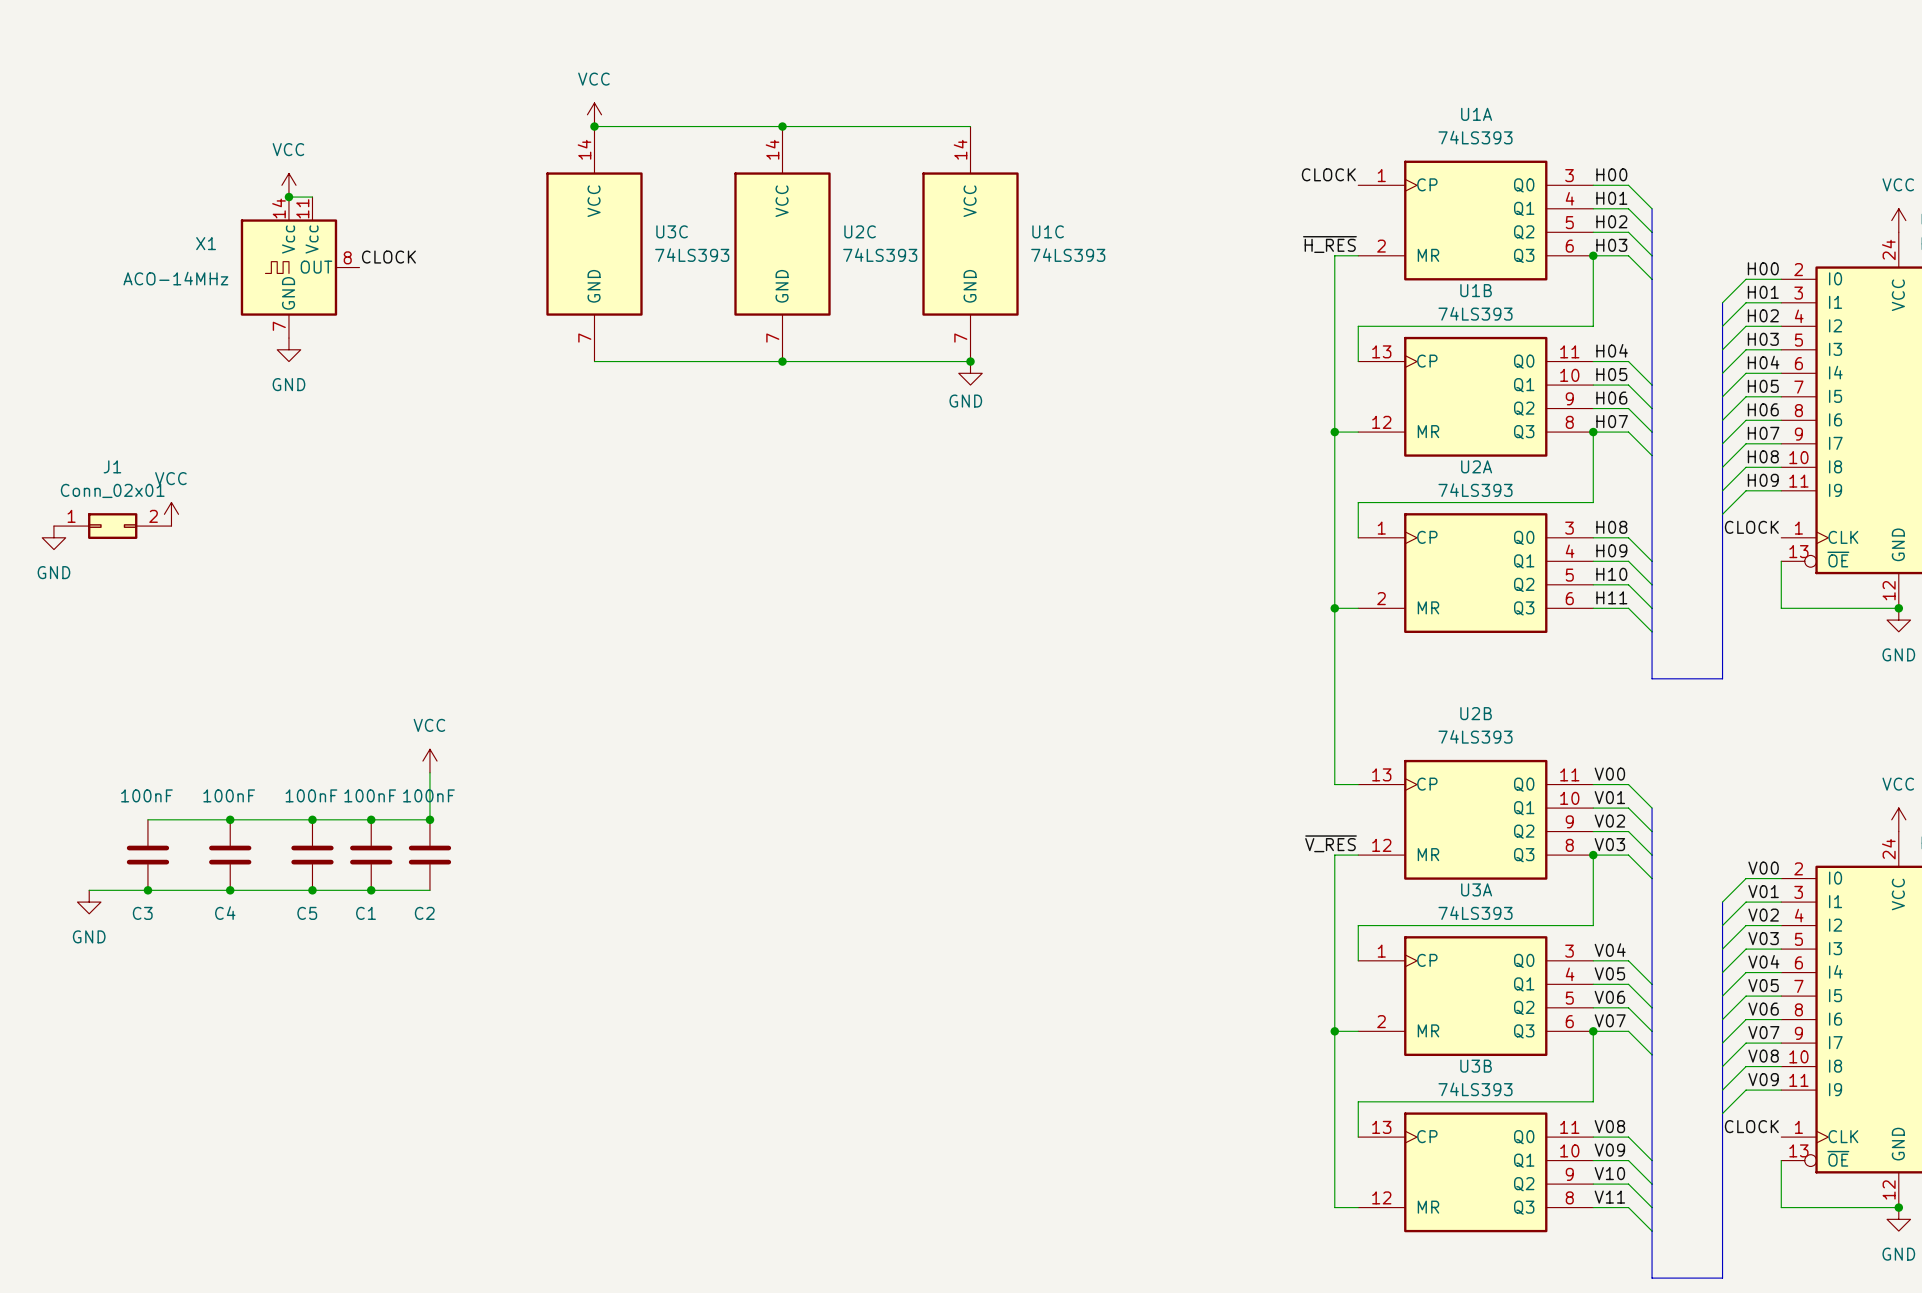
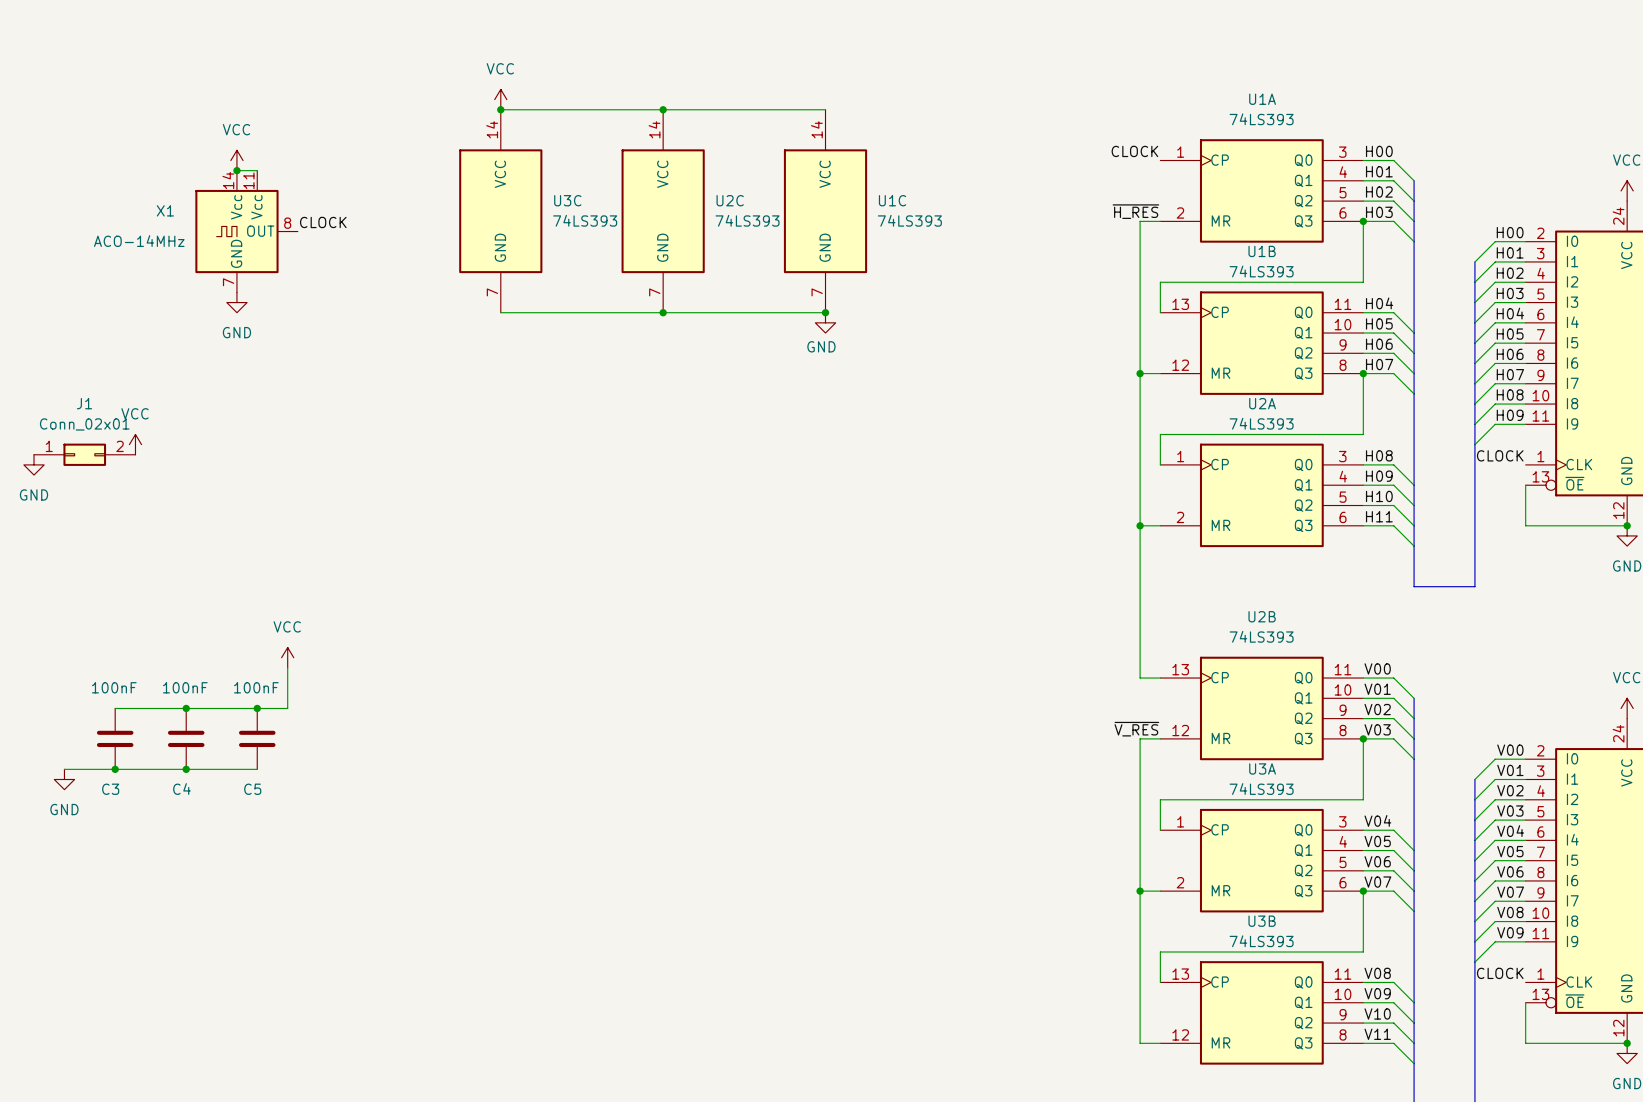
power symbol position: VCC (429, 761) -> VCC (287, 657)
wire: (429, 772) (429, 819) (347, 819) -> (287, 667) (287, 708)
junction: (371, 819) -> none
junction: (429, 819) -> none
C1: 100nF (371, 855) -> none
C2: 100nF (429, 855) -> none
wire: (312, 890) (429, 890) -> none
junction: (312, 890) -> none
junction: (371, 890) -> none

